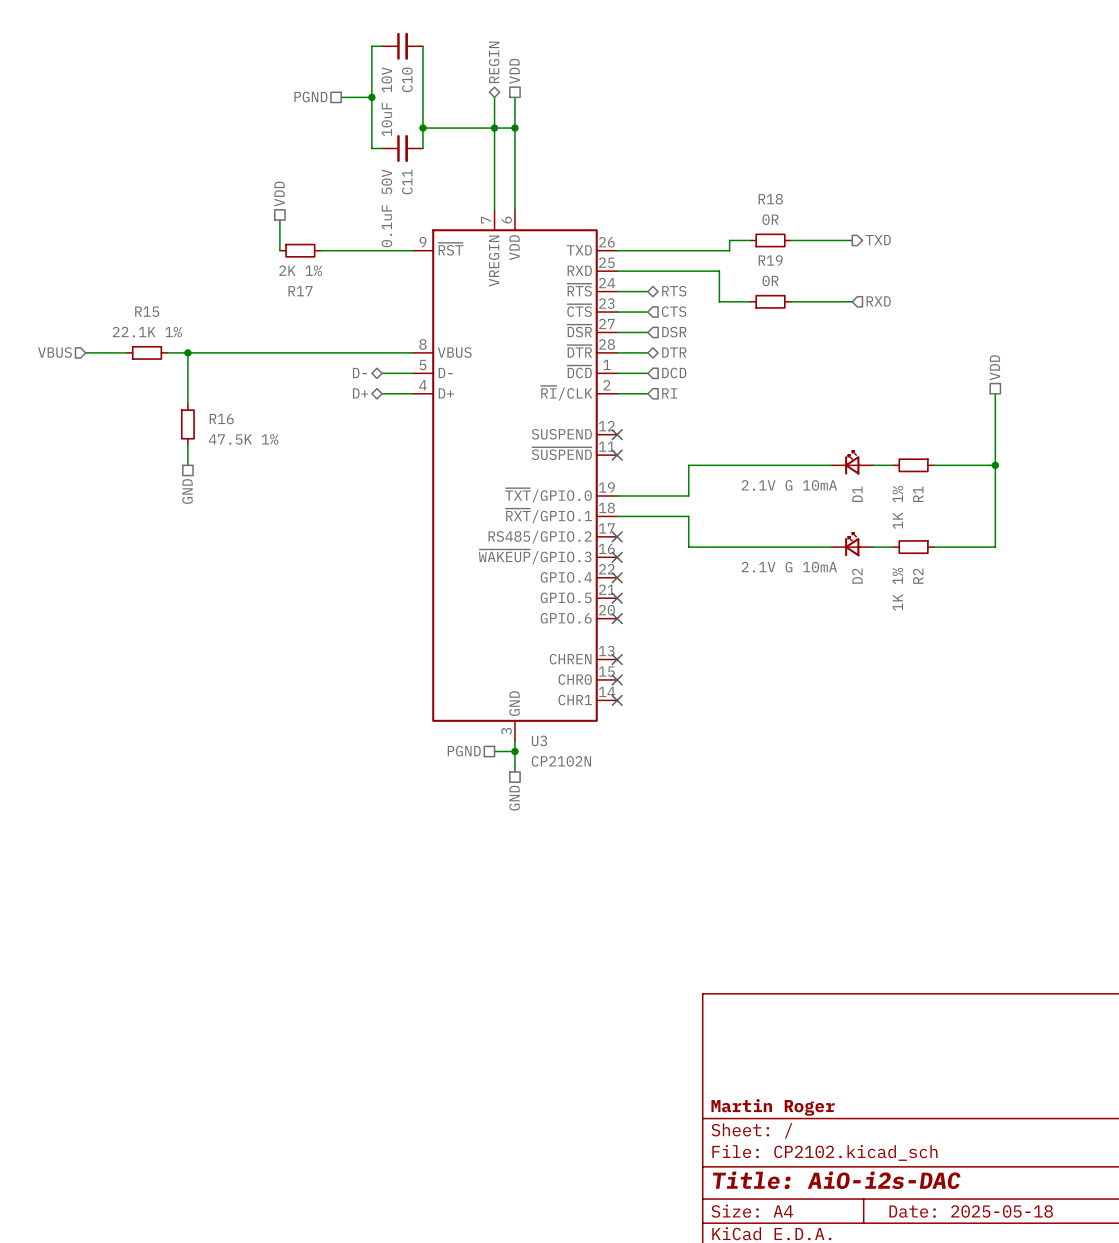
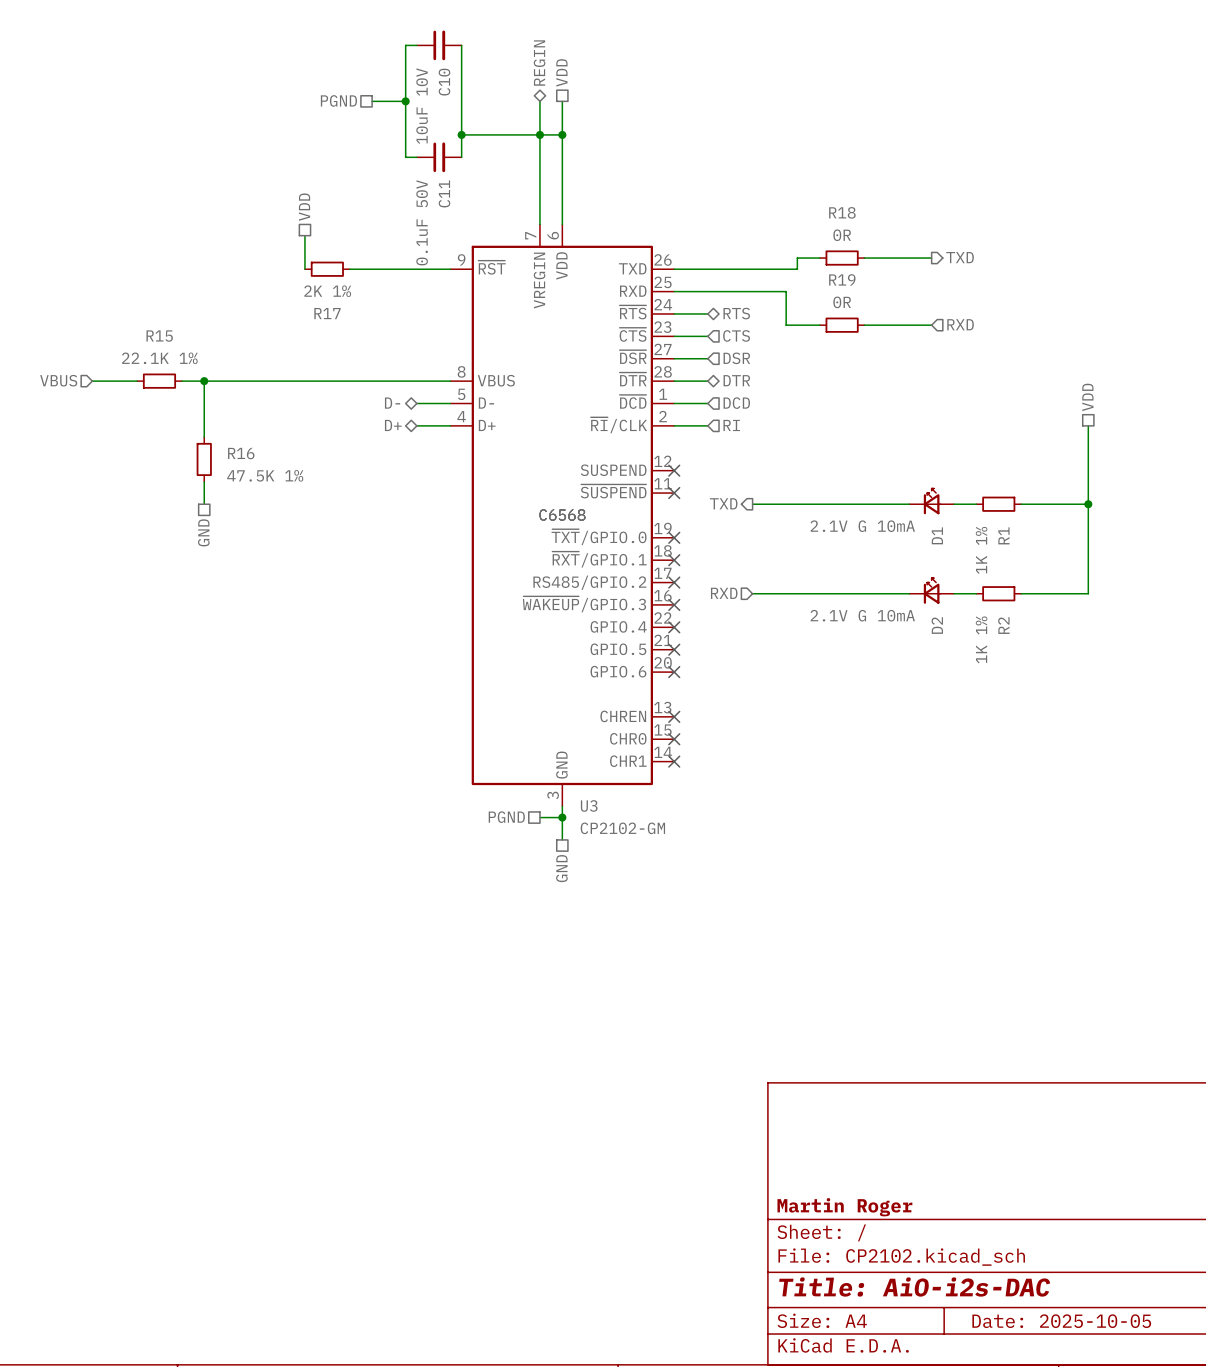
hierarchical label: none -> TXD (723, 503)
wire: (688, 465) (688, 495) (617, 495) -> none
U3 text: none -> C6568 (562, 515)
U3 text: none -> C6568 (562, 515)
no-connect mark: none -> (674, 537)
wire: (617, 516) (688, 516) (688, 547) -> none
no-connect mark: none -> (674, 560)
hierarchical label: none -> RXD (724, 593)
U3 value: CP2102N (561, 761) -> CP2102-GM (622, 828)
title block: Date: 2025-05-18 (971, 1211) -> Date: 2025-10-05 (1061, 1321)

